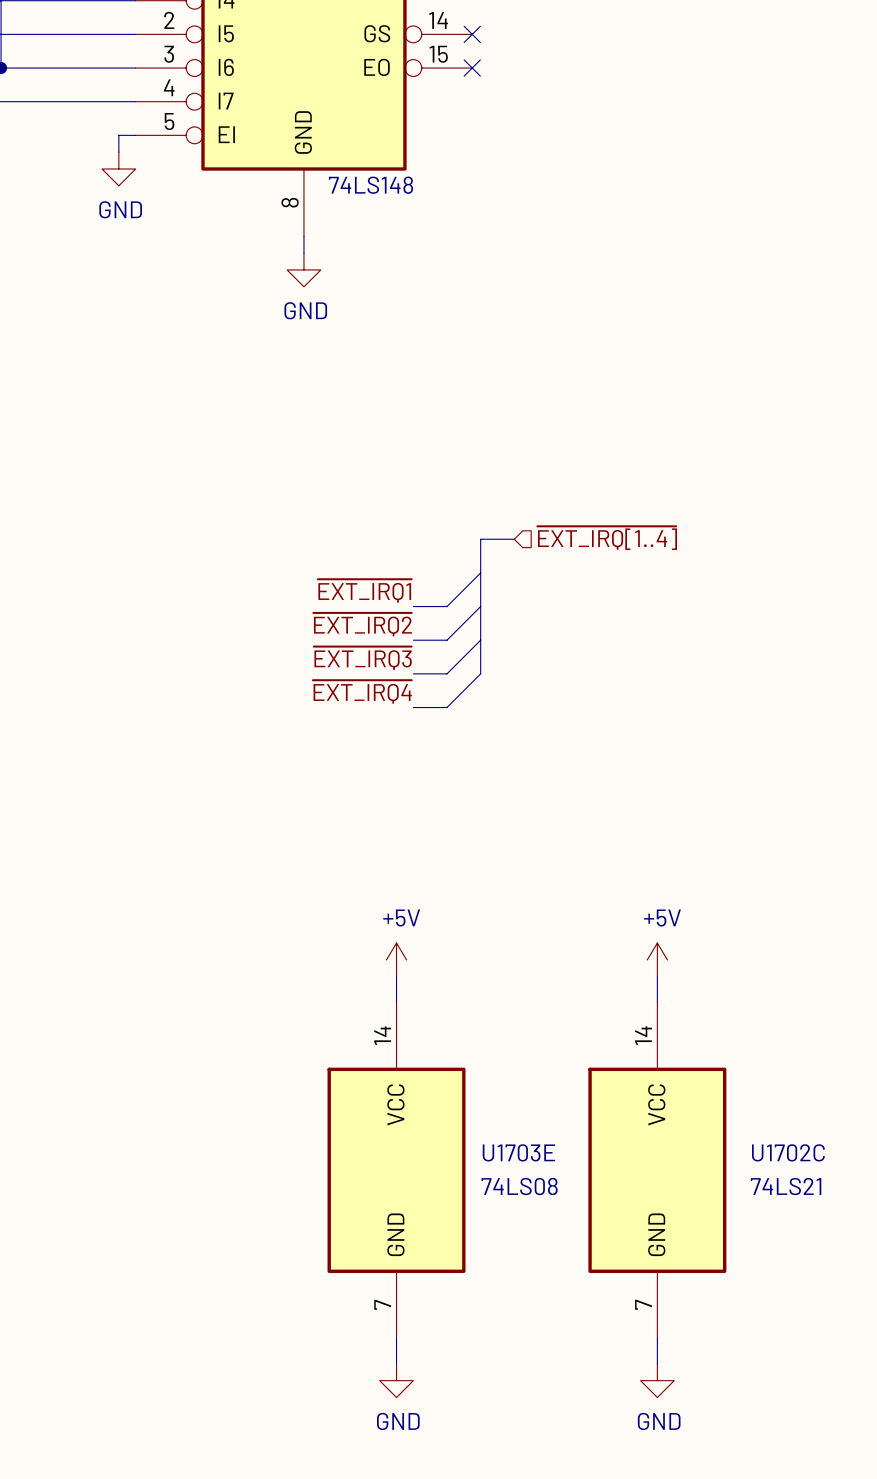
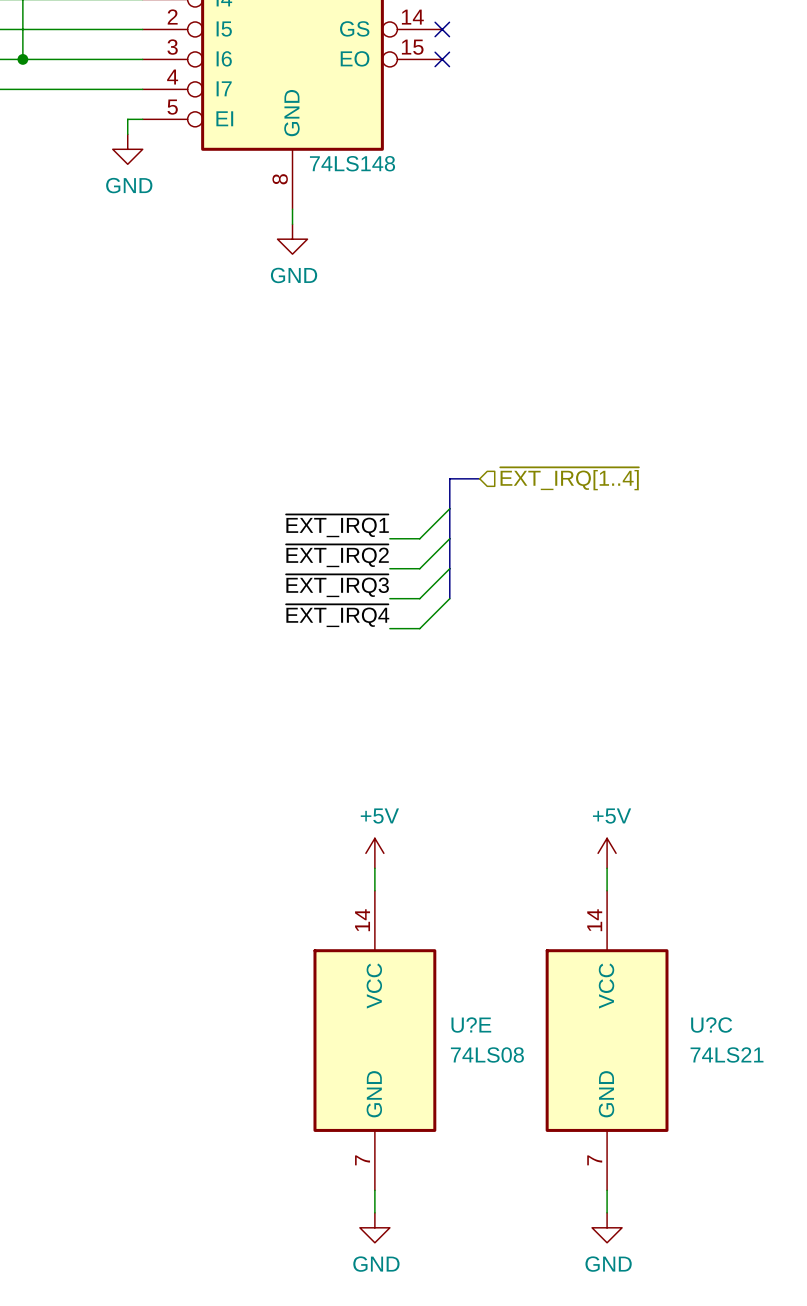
U1703E name: U1703E (518, 1152) -> U?E (471, 1025)
U1702C name: U1702C (788, 1152) -> U?C (711, 1025)

